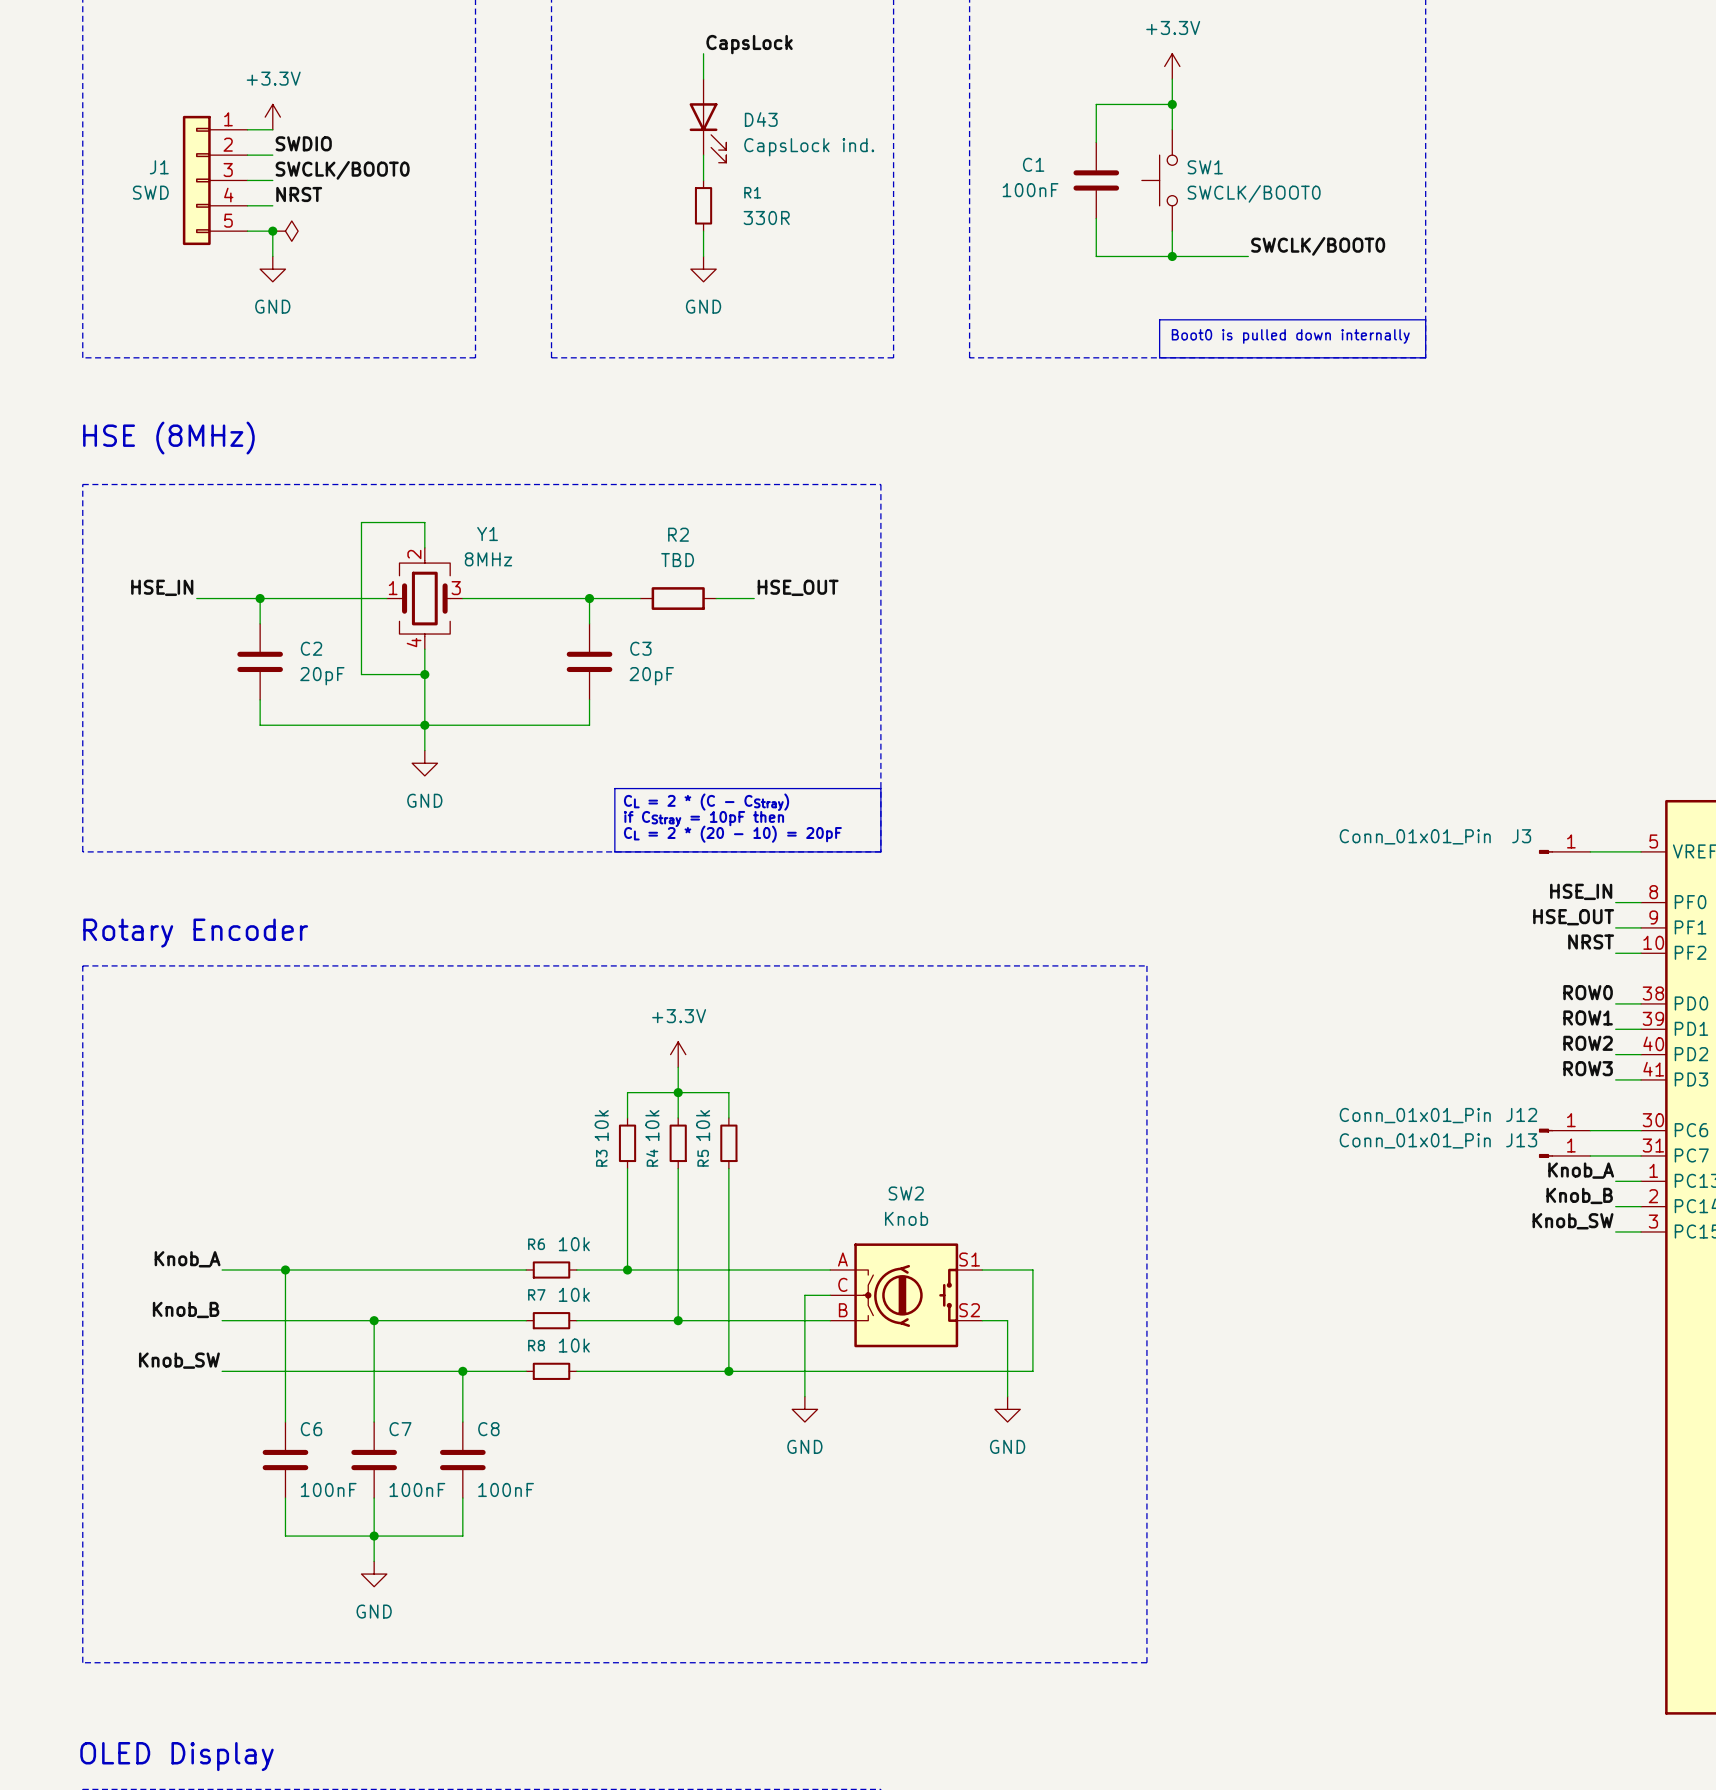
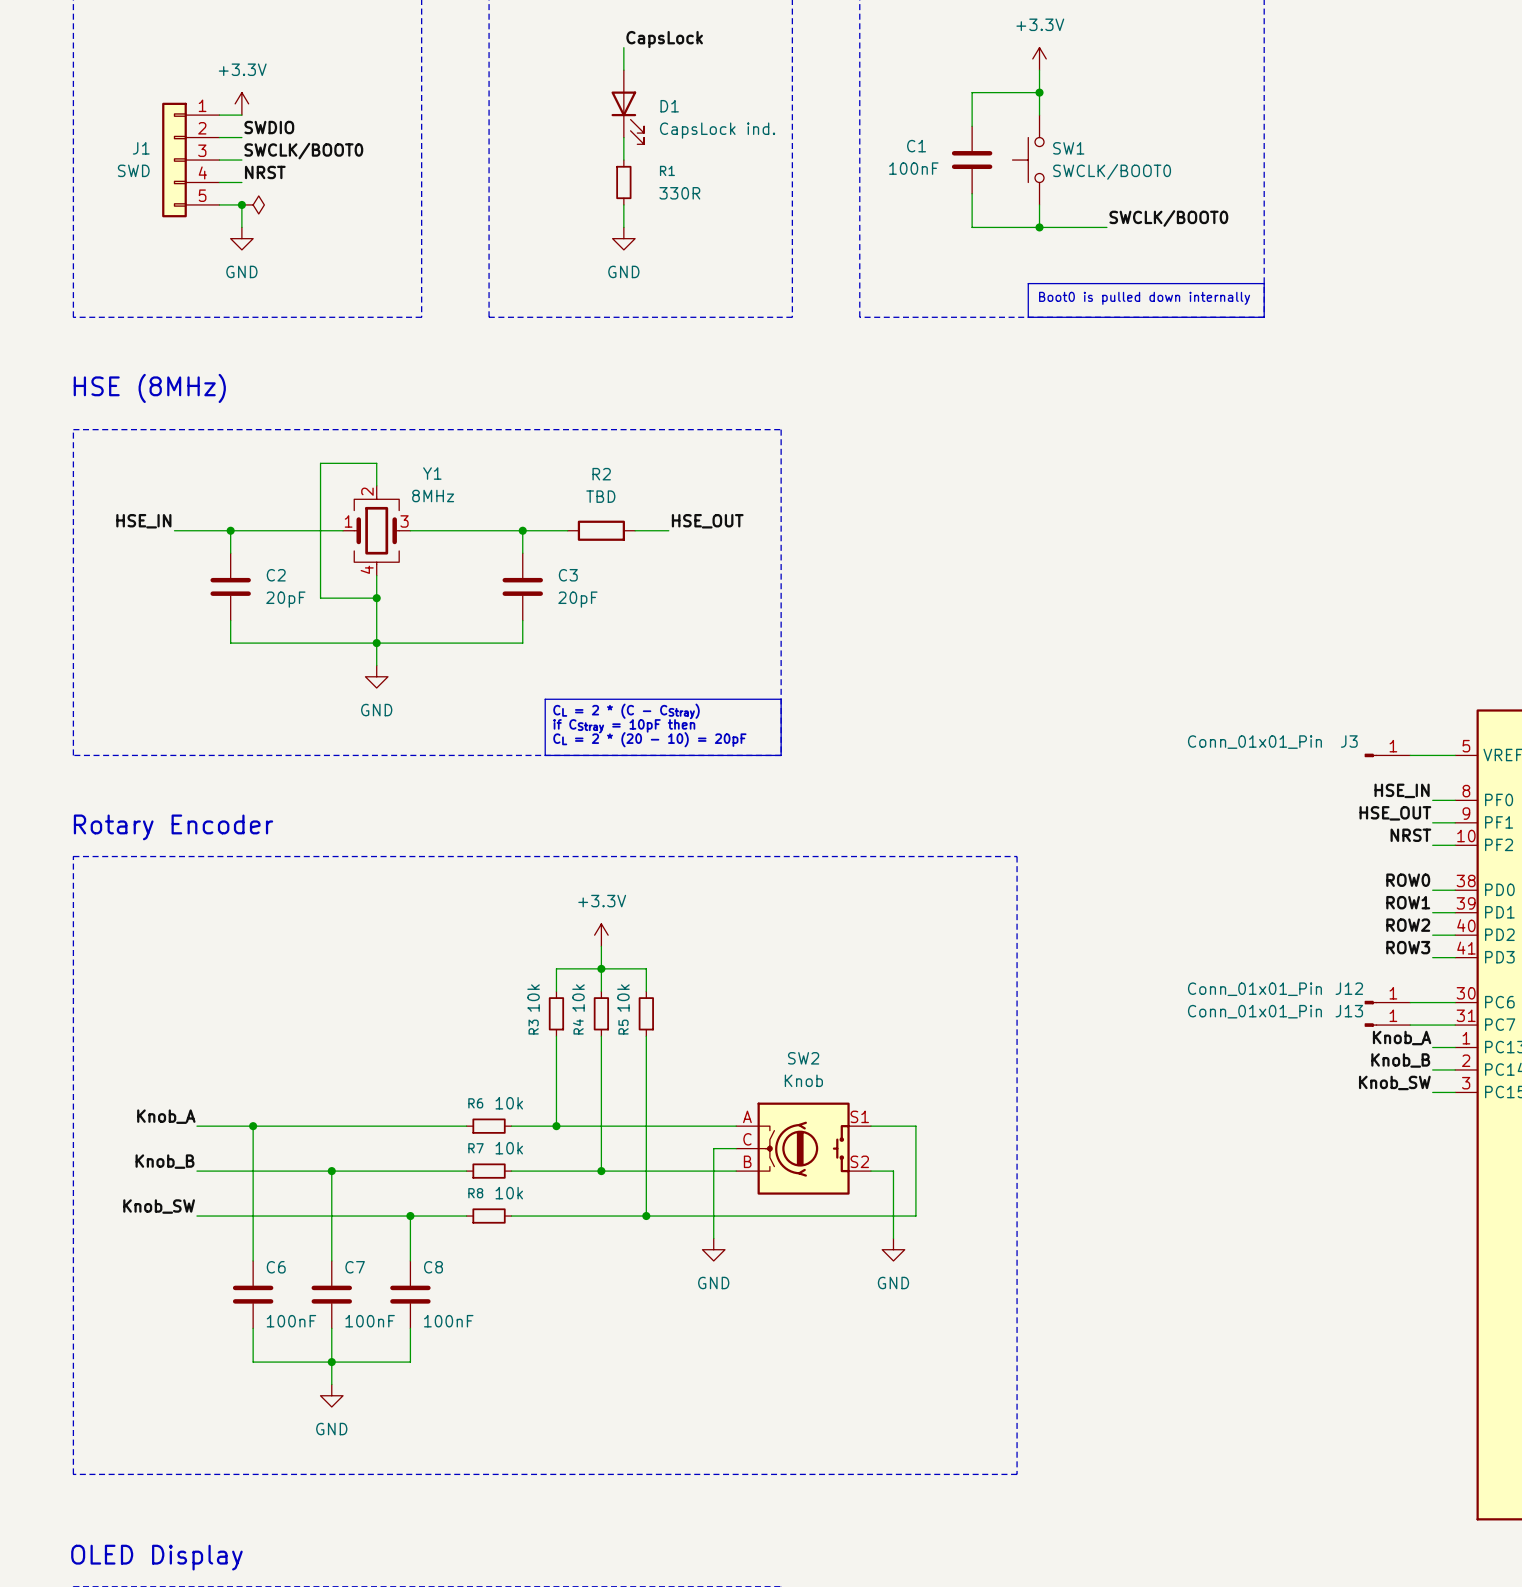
D43 name: D43 (761, 119) -> D1 (669, 106)

